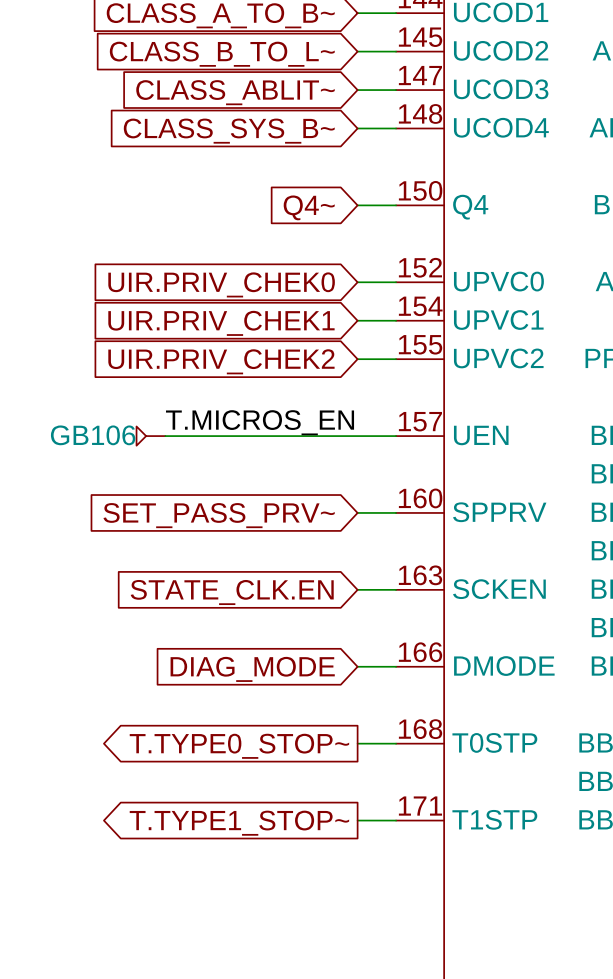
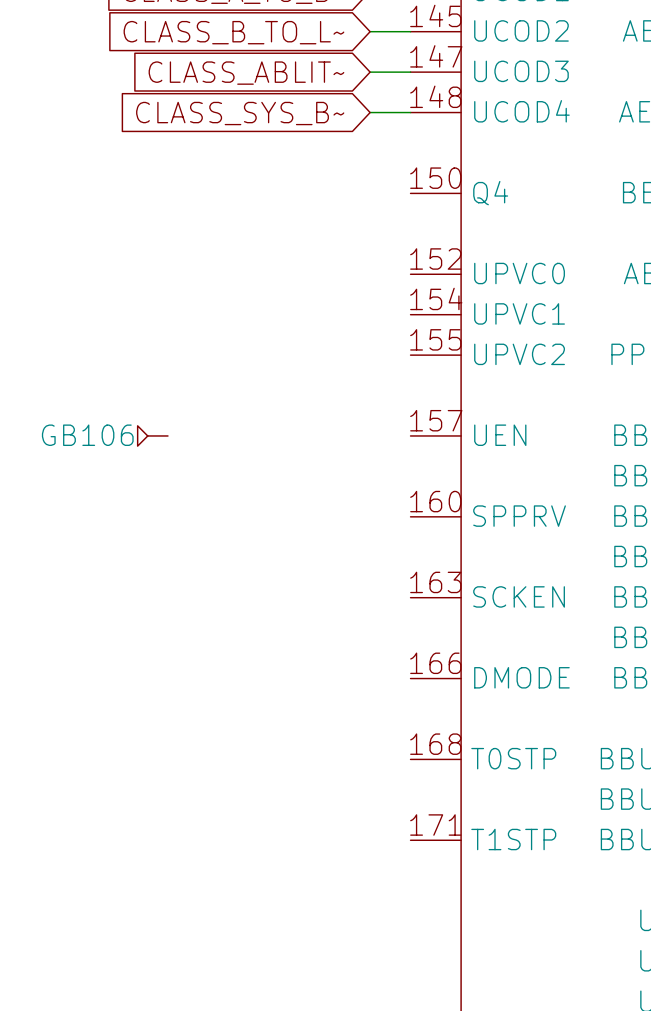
wire: (357, 205) (396, 205) -> none
global label: Q4~ (309, 207) -> none
wire: (357, 282) (396, 282) -> none
global label: UIR.PRIV_CHEK0 (221, 284) -> none
wire: (357, 320) (396, 320) -> none
global label: UIR.PRIV_CHEK1 (221, 323) -> none
wire: (357, 359) (396, 359) -> none
global label: UIR.PRIV_CHEK2 (221, 361) -> none
label: T.MICROS_EN (260, 422) -> none
wire: (165, 436) (396, 436) -> none
wire: (357, 512) (396, 512) -> none
global label: SET_PASS_PRV~ (219, 515) -> none
wire: (357, 589) (396, 589) -> none
global label: STATE_CLK.EN (232, 592) -> none
wire: (357, 666) (396, 666) -> none
global label: DIAG_MODE (252, 669) -> none
wire: (357, 743) (396, 743) -> none
global label: T.TYPE0_STOP~ (239, 746) -> none
wire: (357, 820) (396, 820) -> none
global label: T.TYPE1_STOP~ (239, 823) -> none

